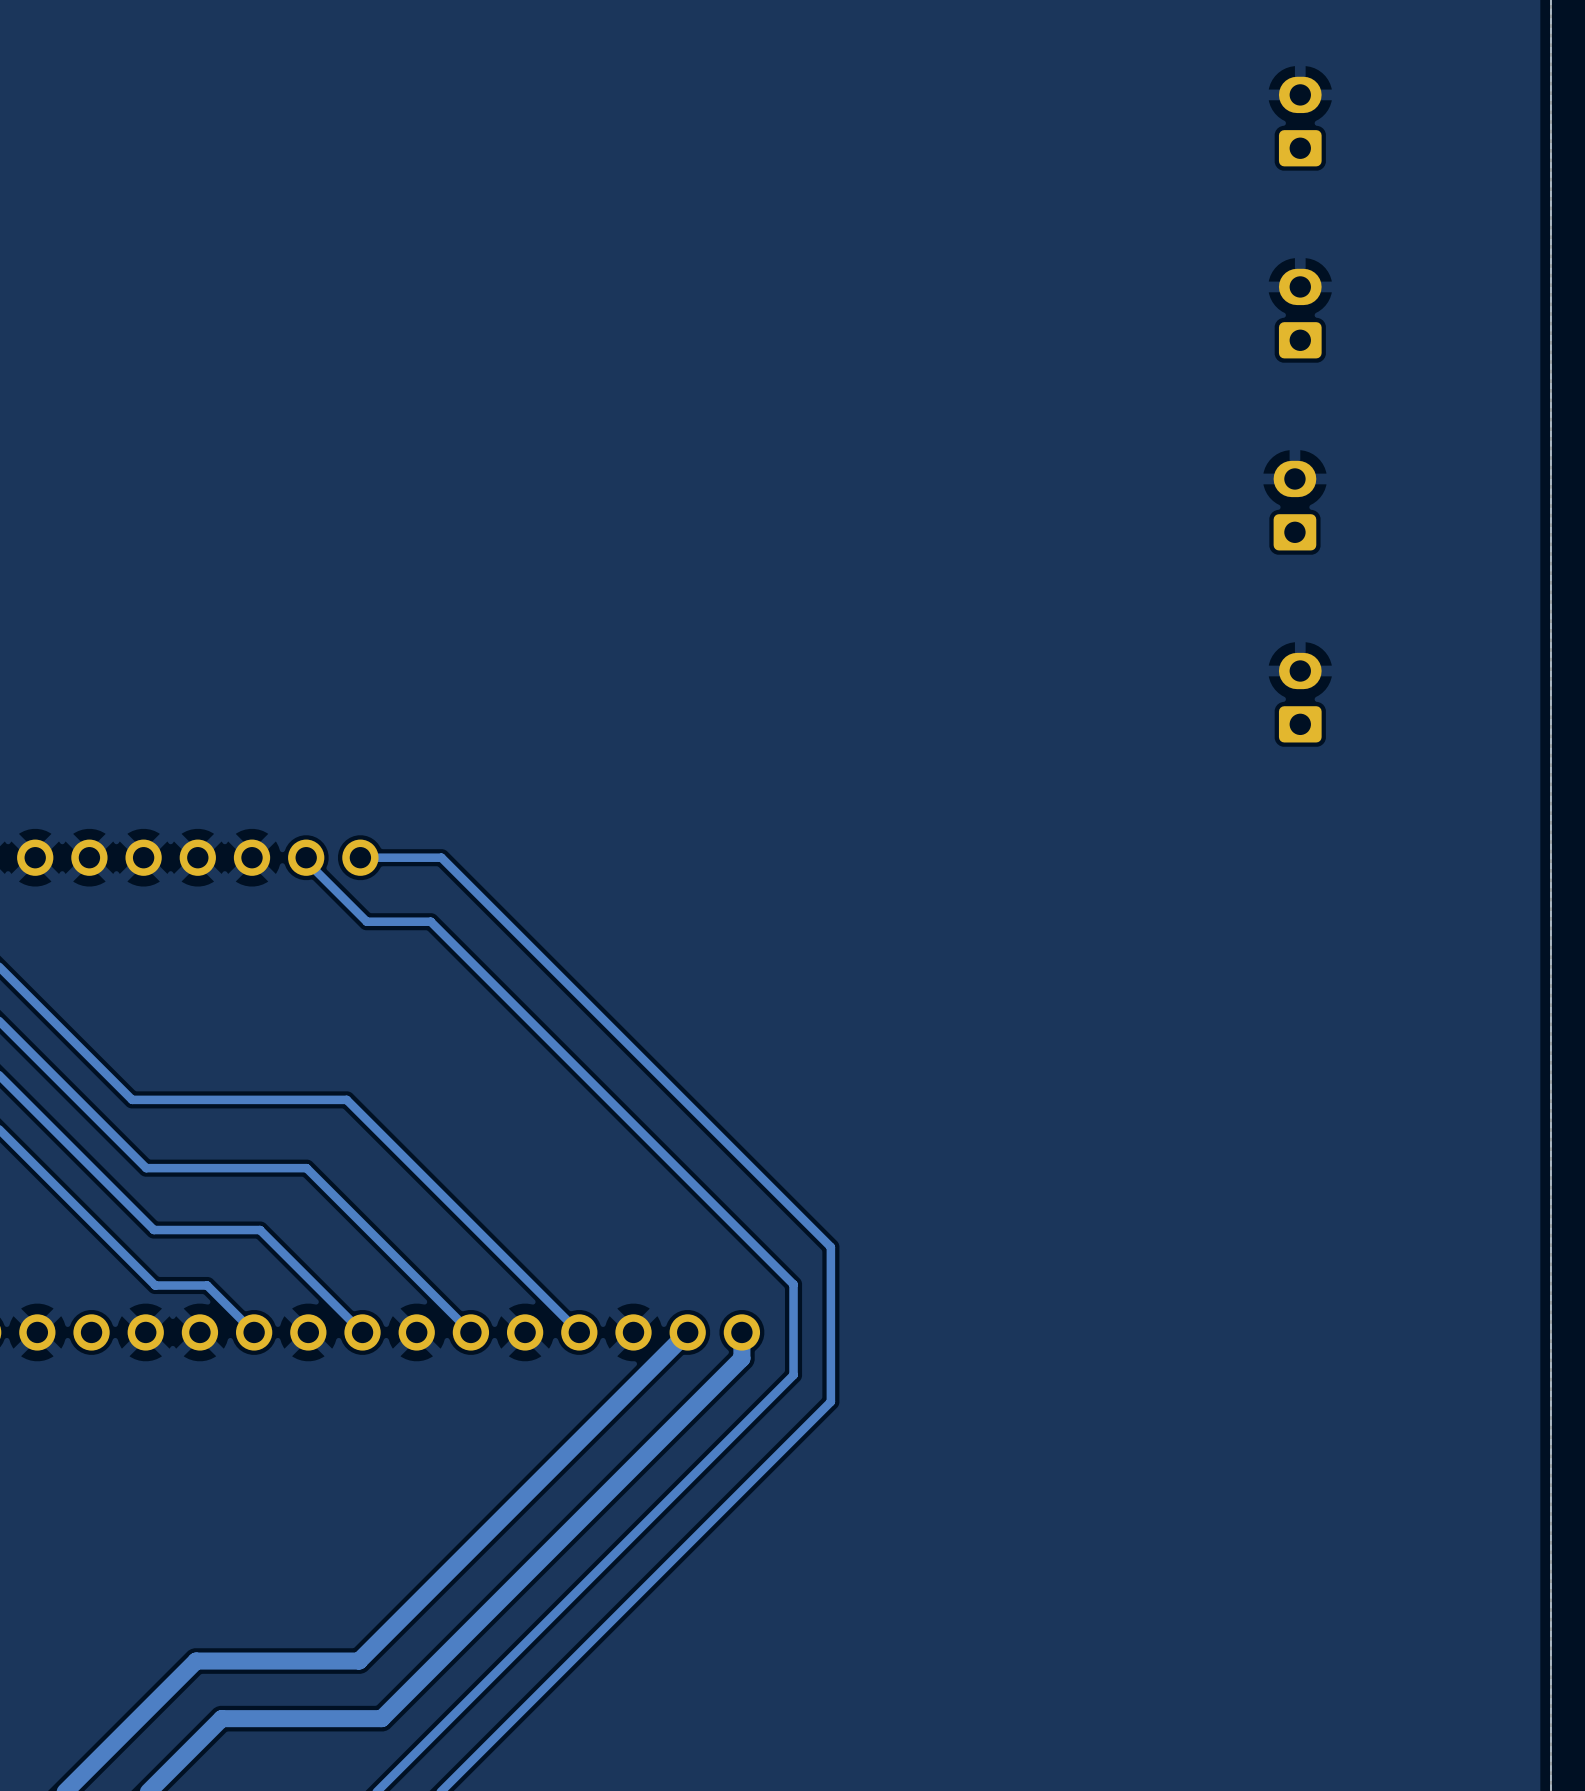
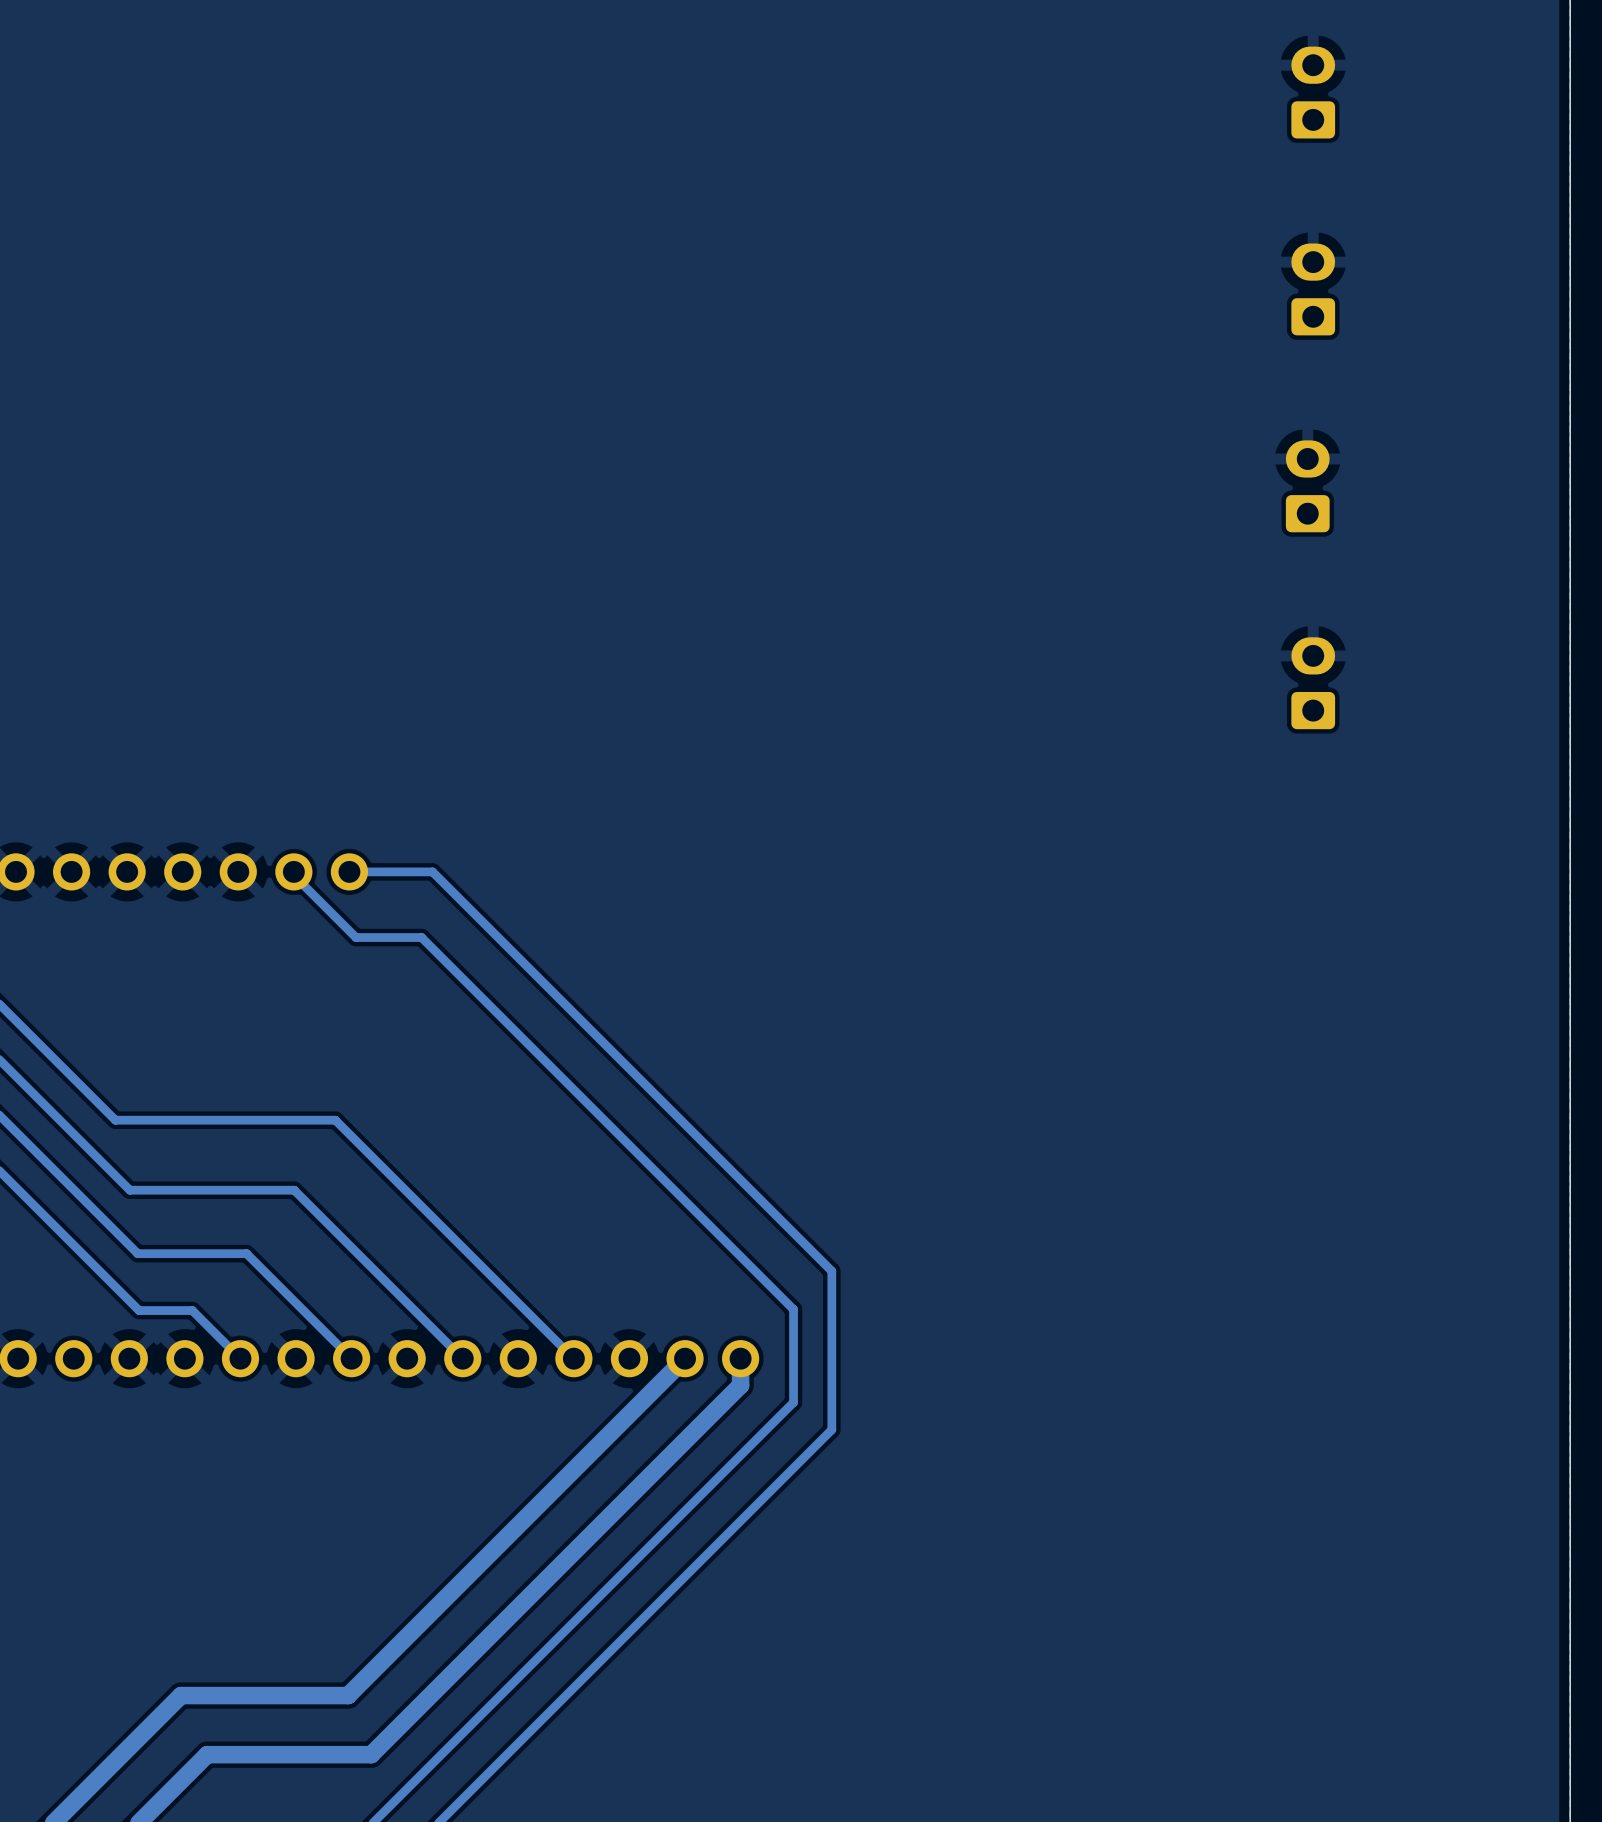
part position: (1300, 121) -> (1313, 92)
part position: (1300, 313) -> (1313, 289)
part position: (1294, 505) -> (1307, 486)
part position: (1300, 697) -> (1313, 683)

